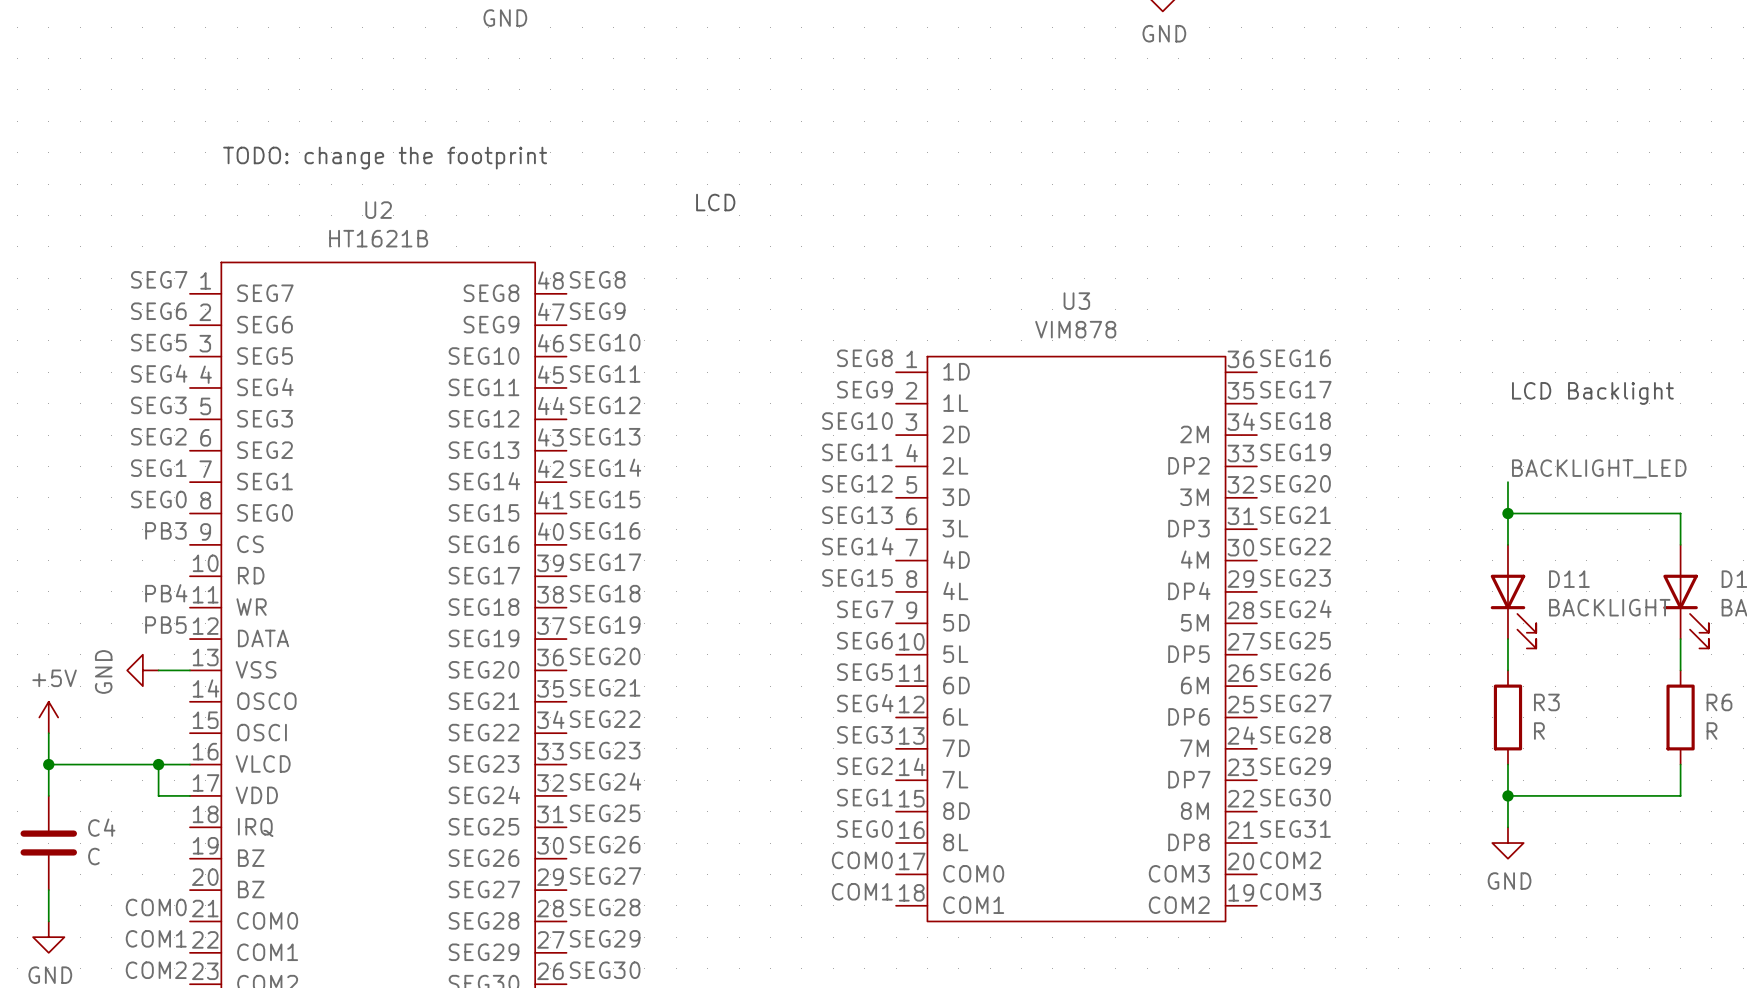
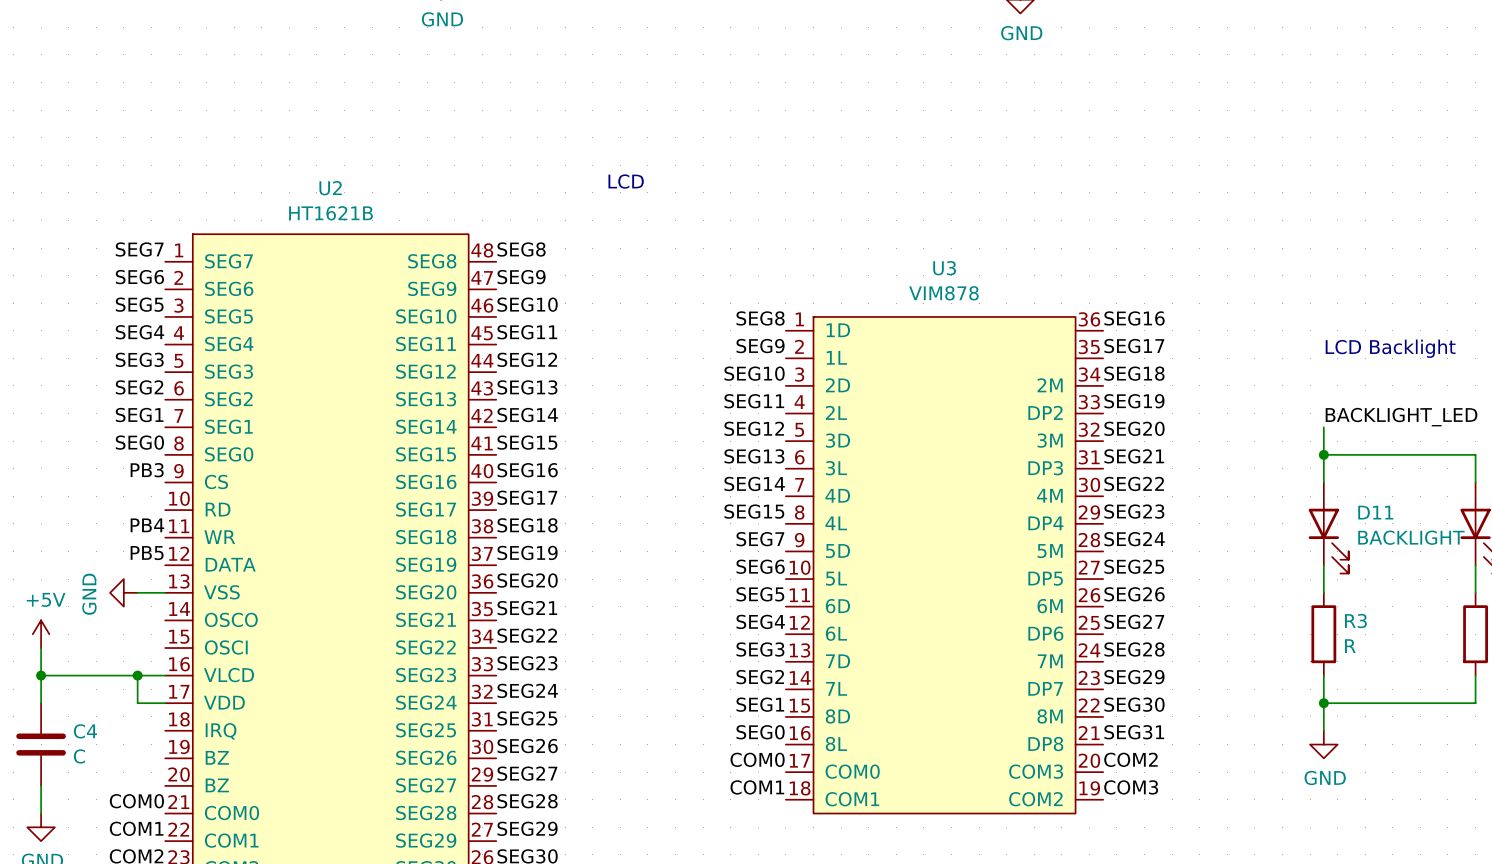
text: TODO: change the footprint (385, 158) -> none

